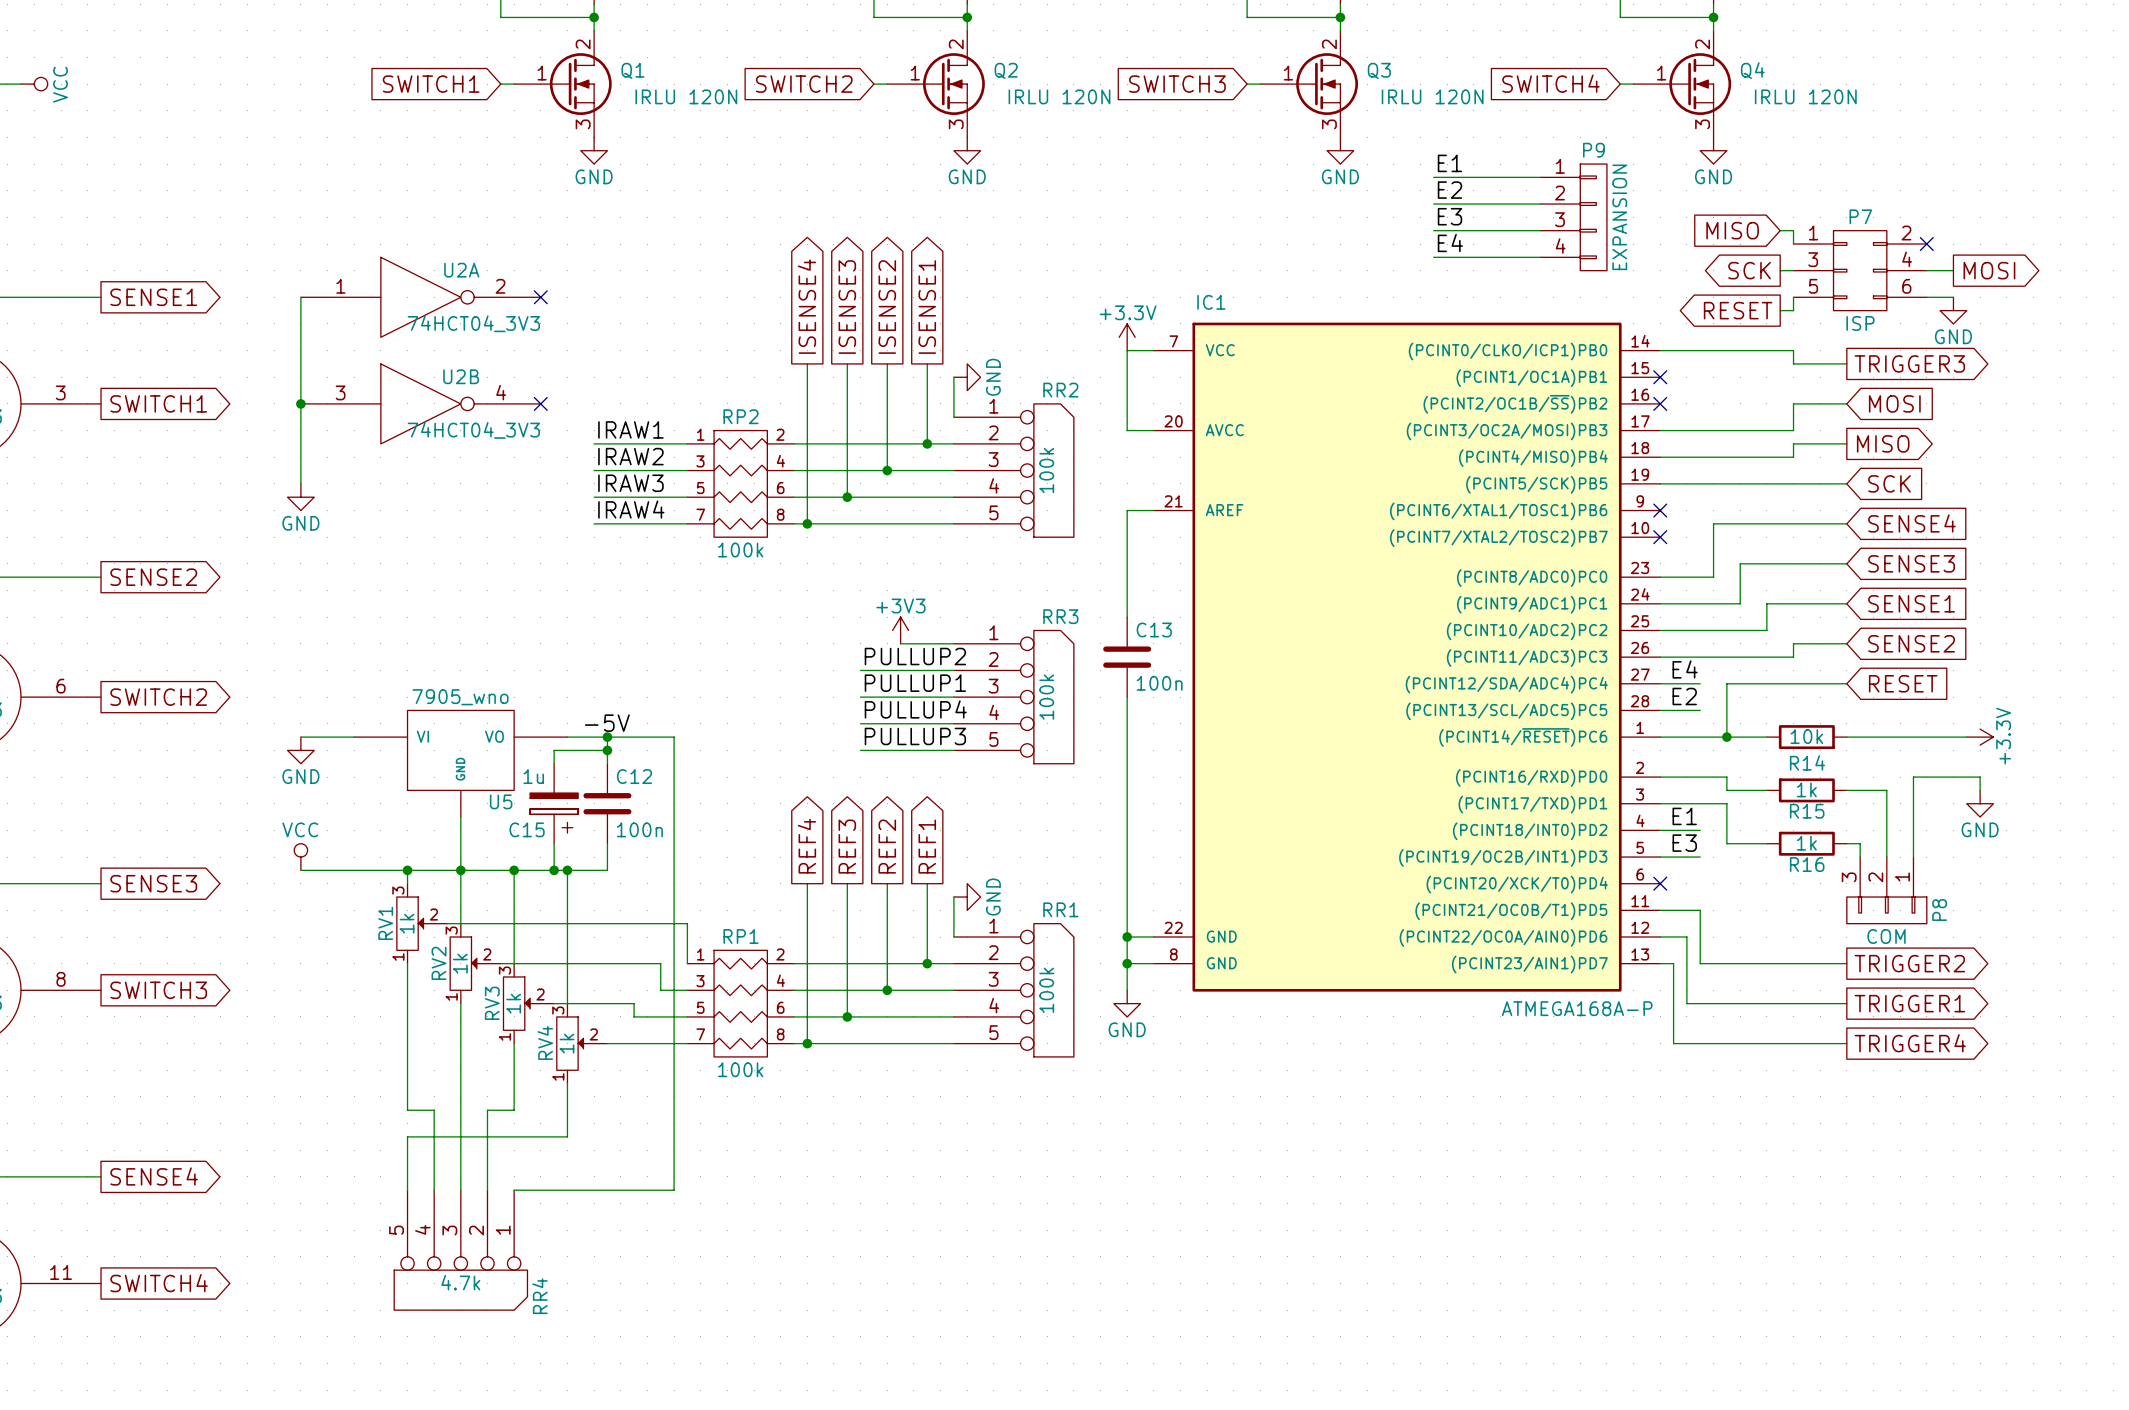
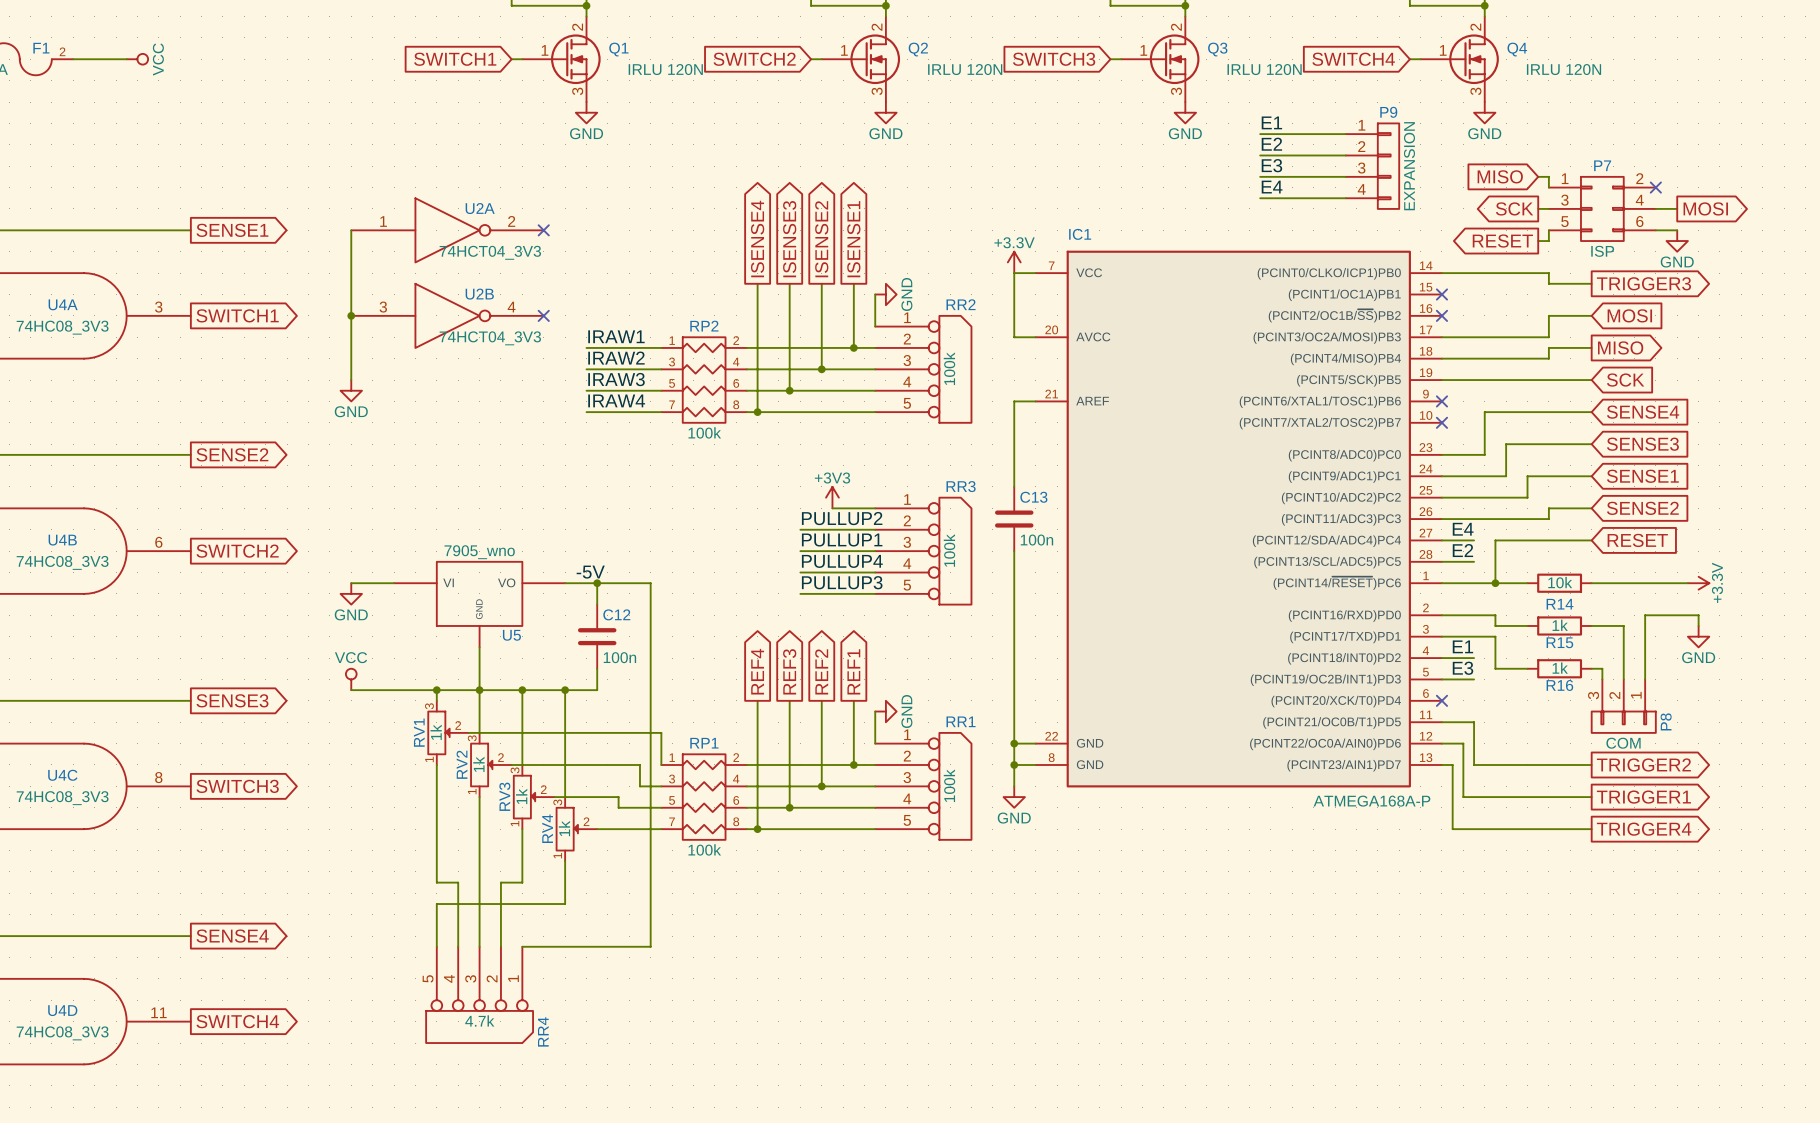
wire: (607, 750) (554, 750) (554, 763) -> none
junction: (607, 750) -> none
C15: 1u (554, 803) -> none
wire: (554, 843) (554, 870) -> none
junction: (554, 870) -> none

